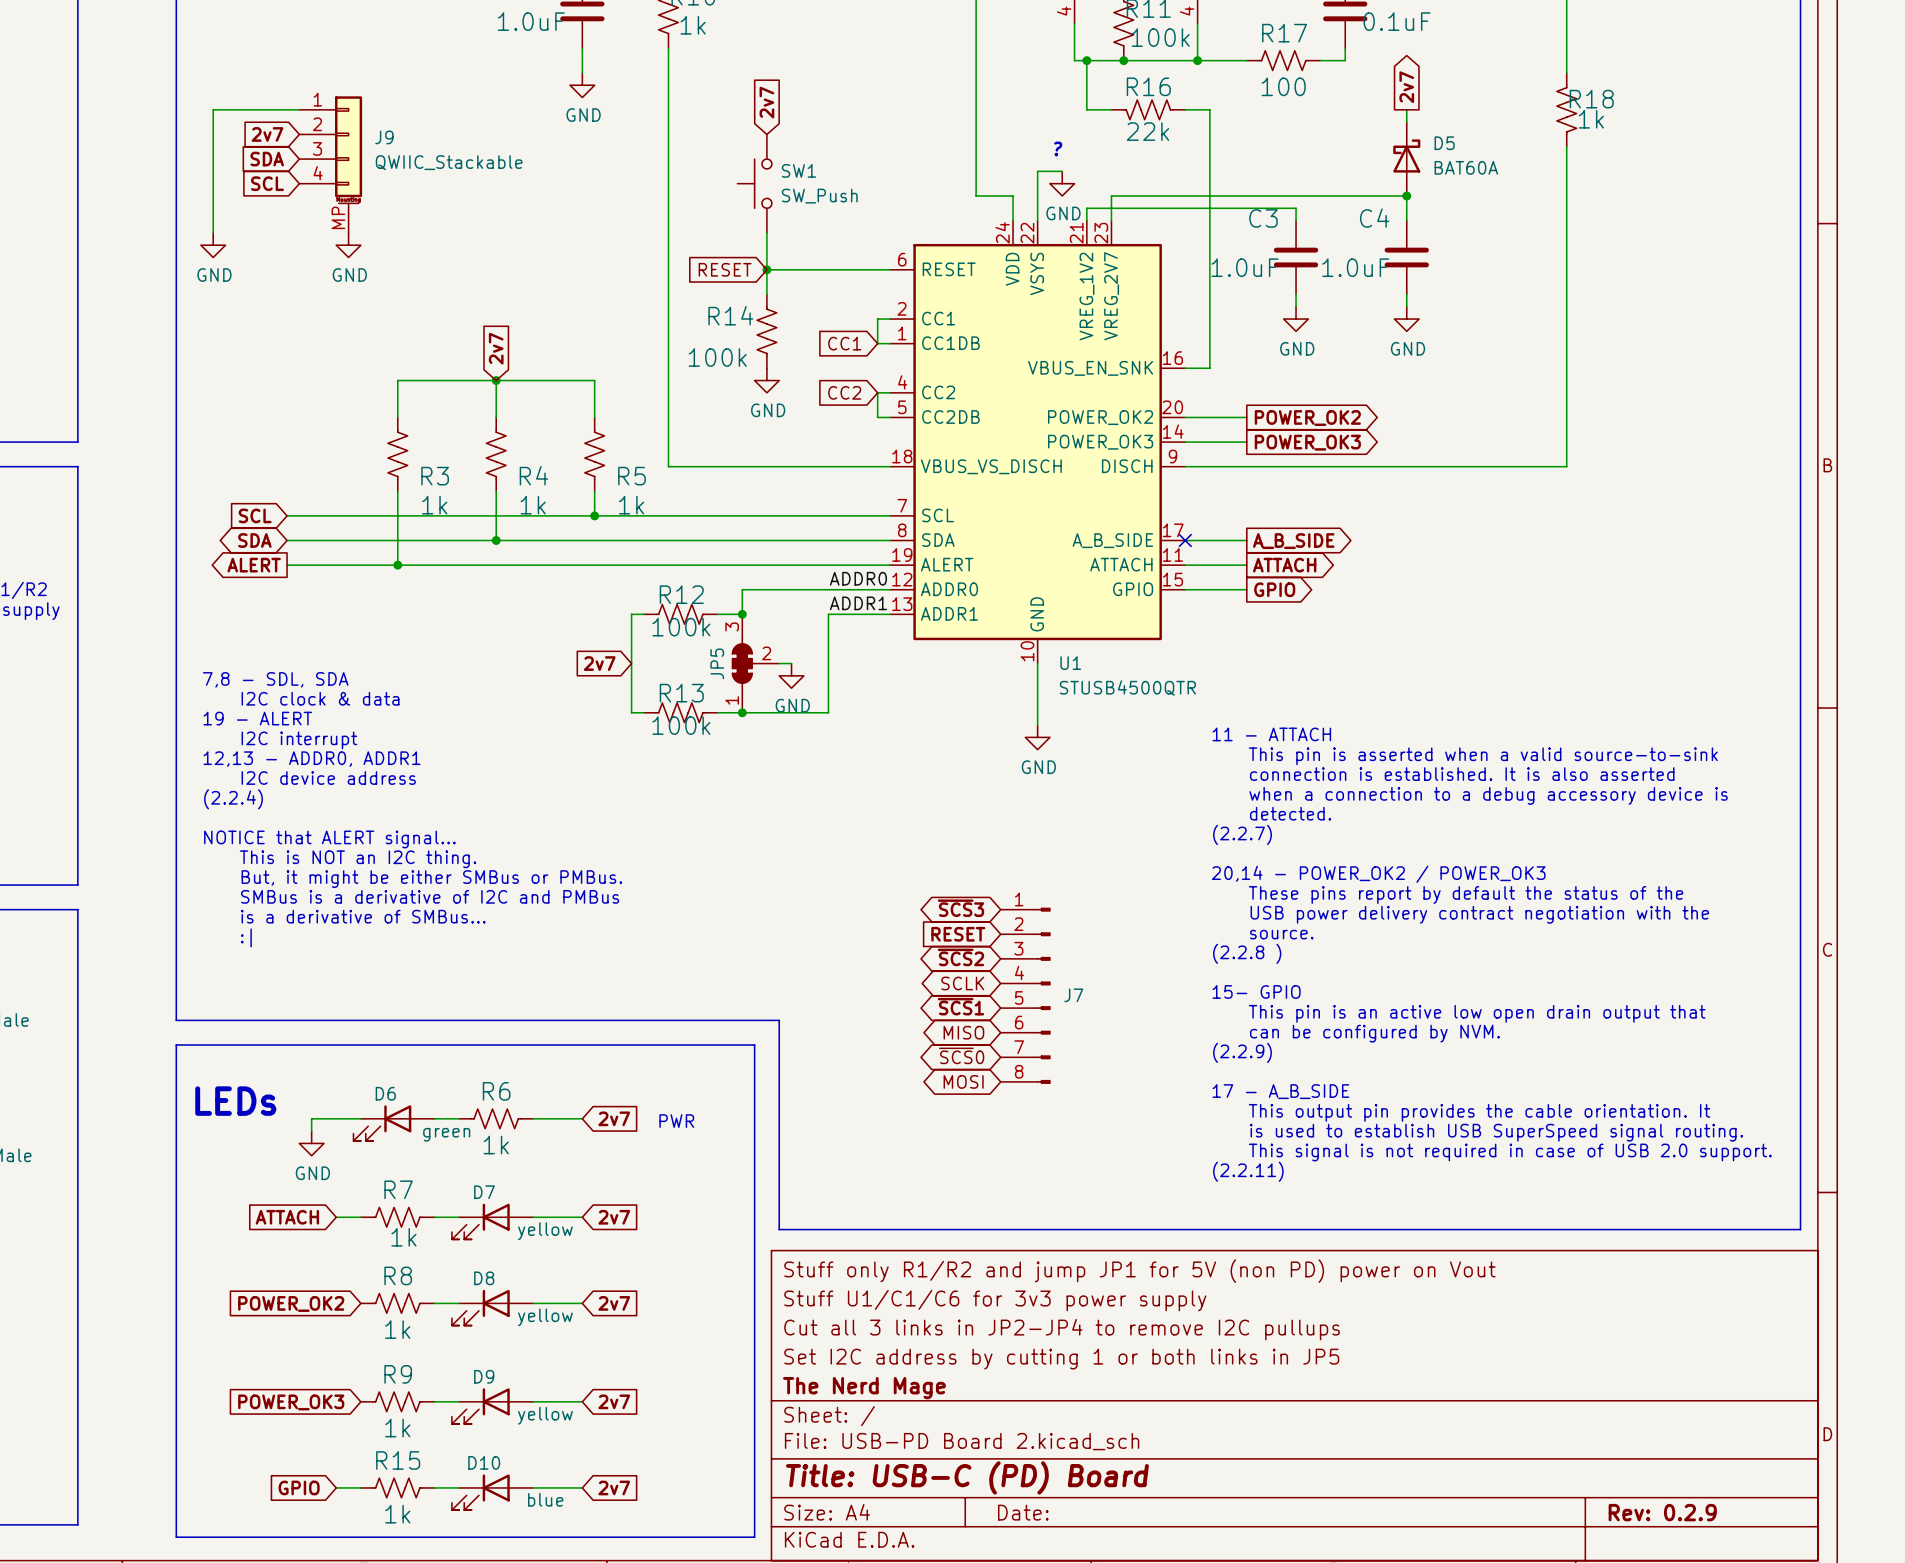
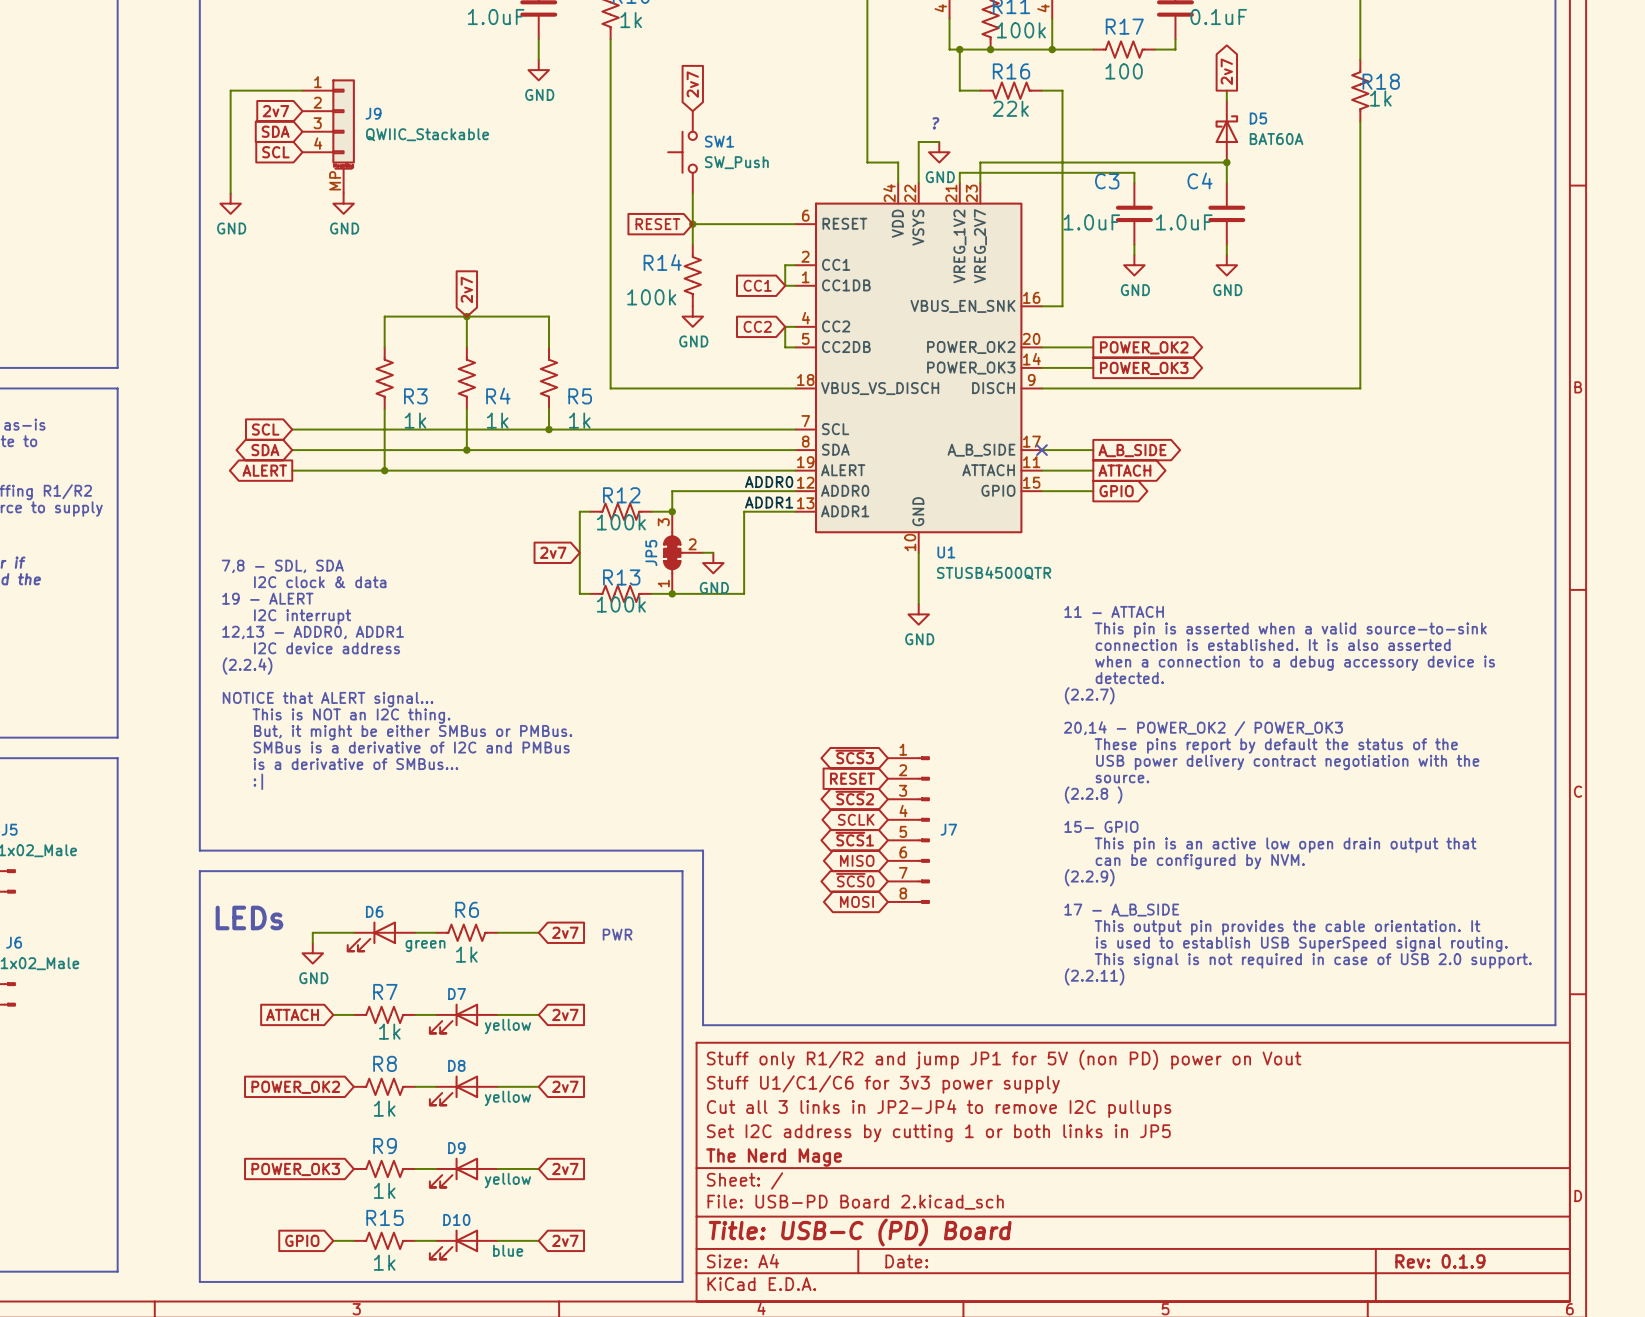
title block: Rev: 0.2.9 (1662, 1512) -> Rev: 0.1.9 (1440, 1261)

